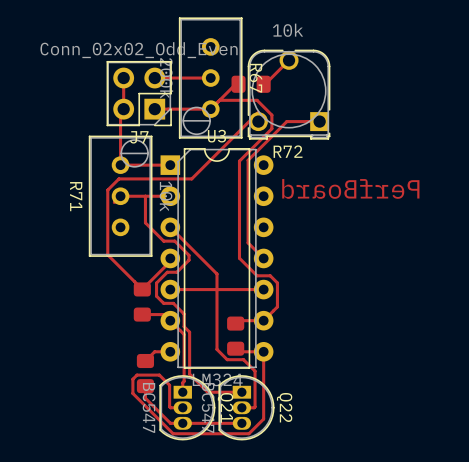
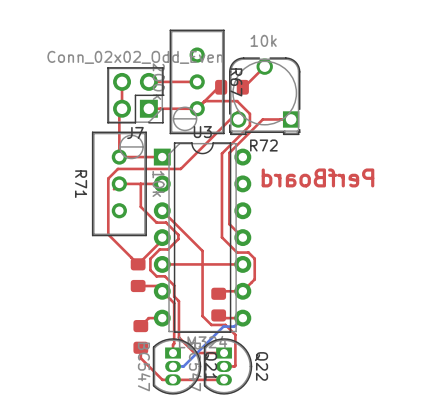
top track: (263, 351) (263, 419) (248, 433) (173, 433) (132, 393) (132, 379) (137, 375) (159, 375) (169, 385) (169, 406) (182, 407) -> none
bottom track: none -> (242, 318) (234, 326) (223, 326) (183, 366) (173, 366)

